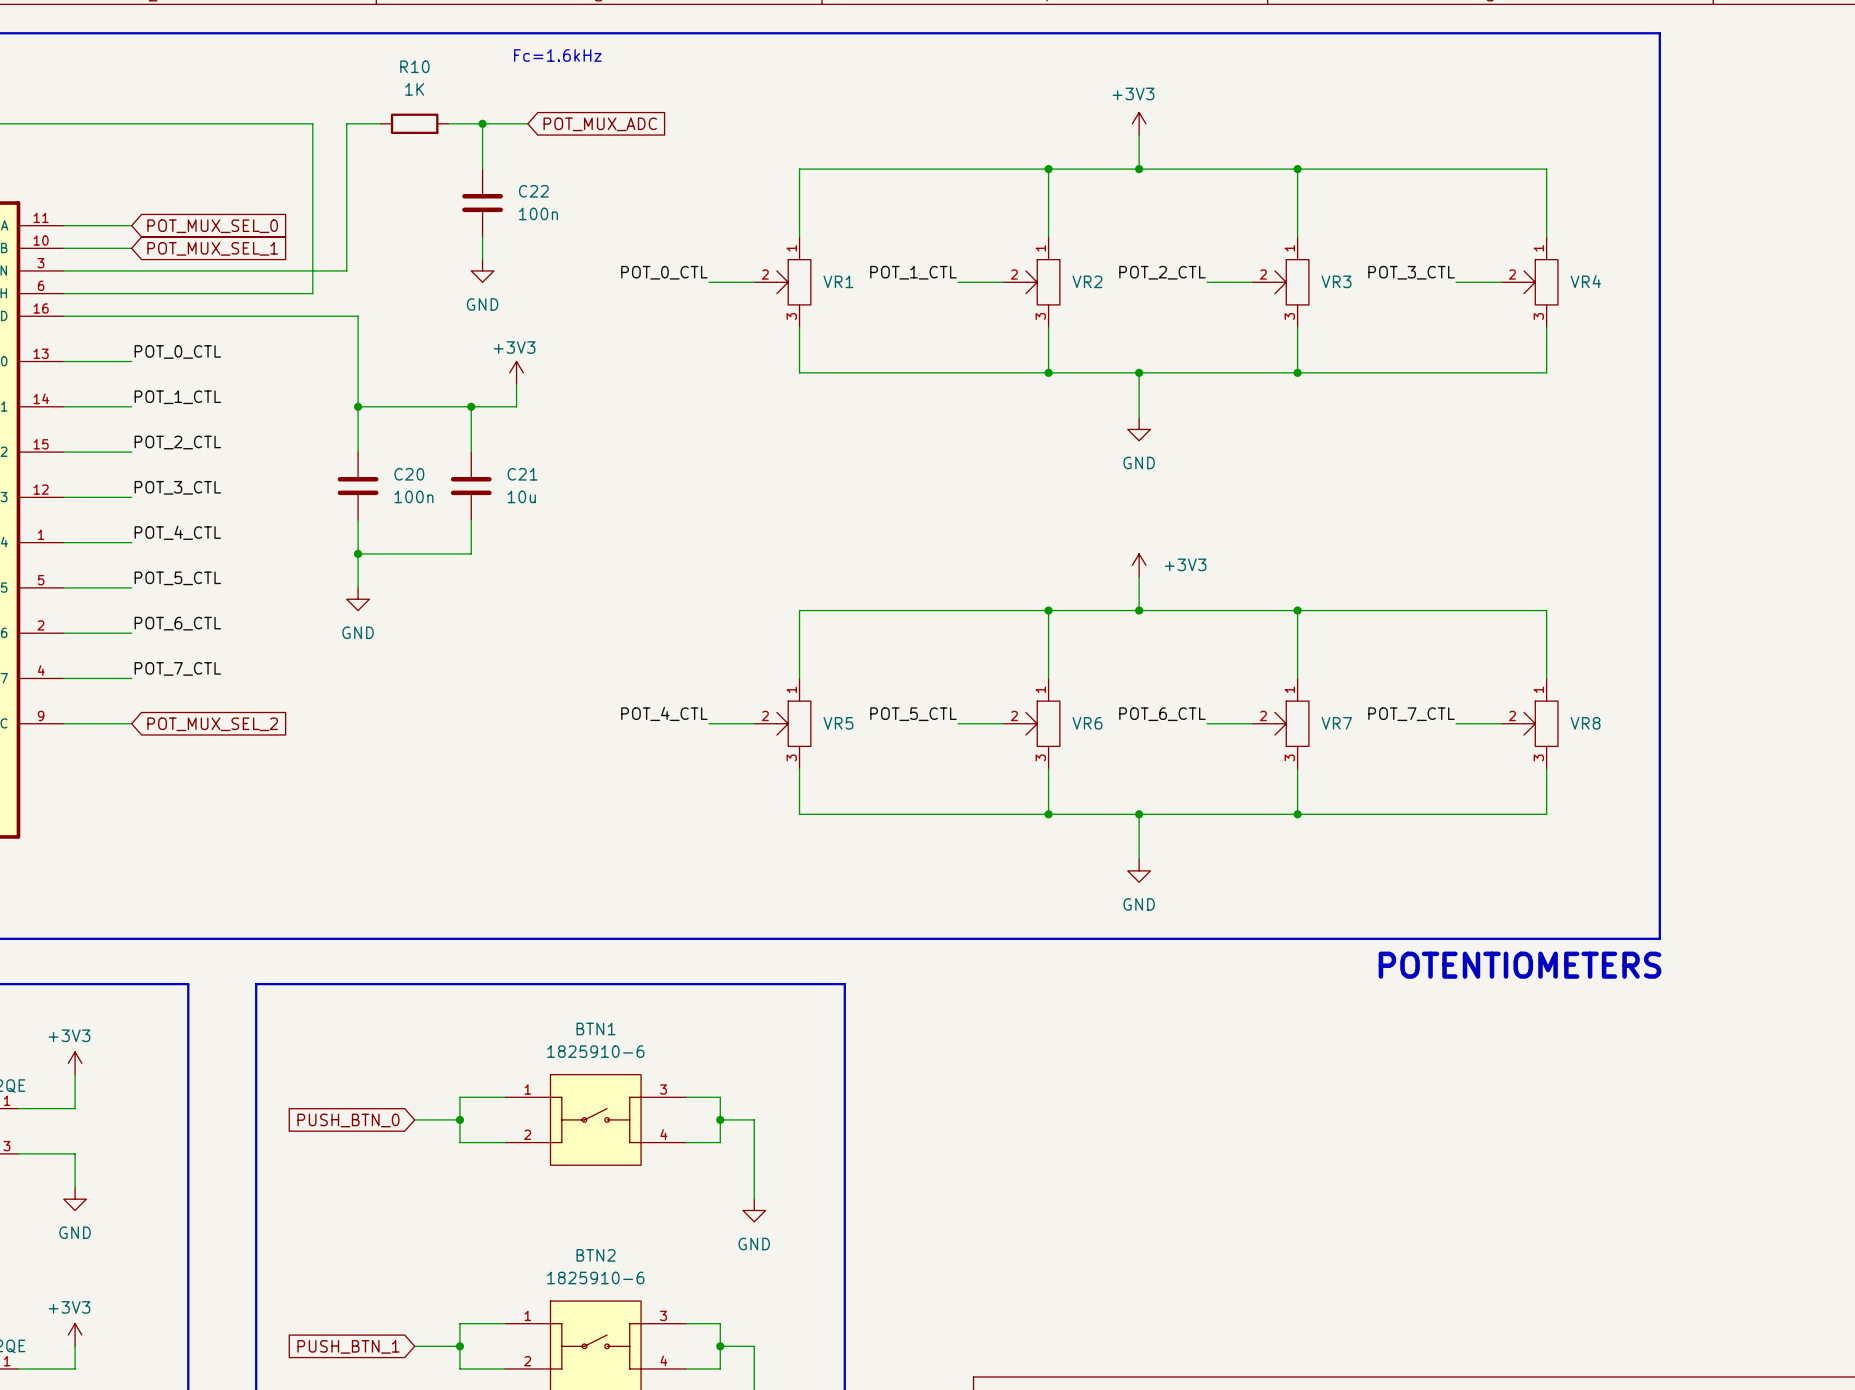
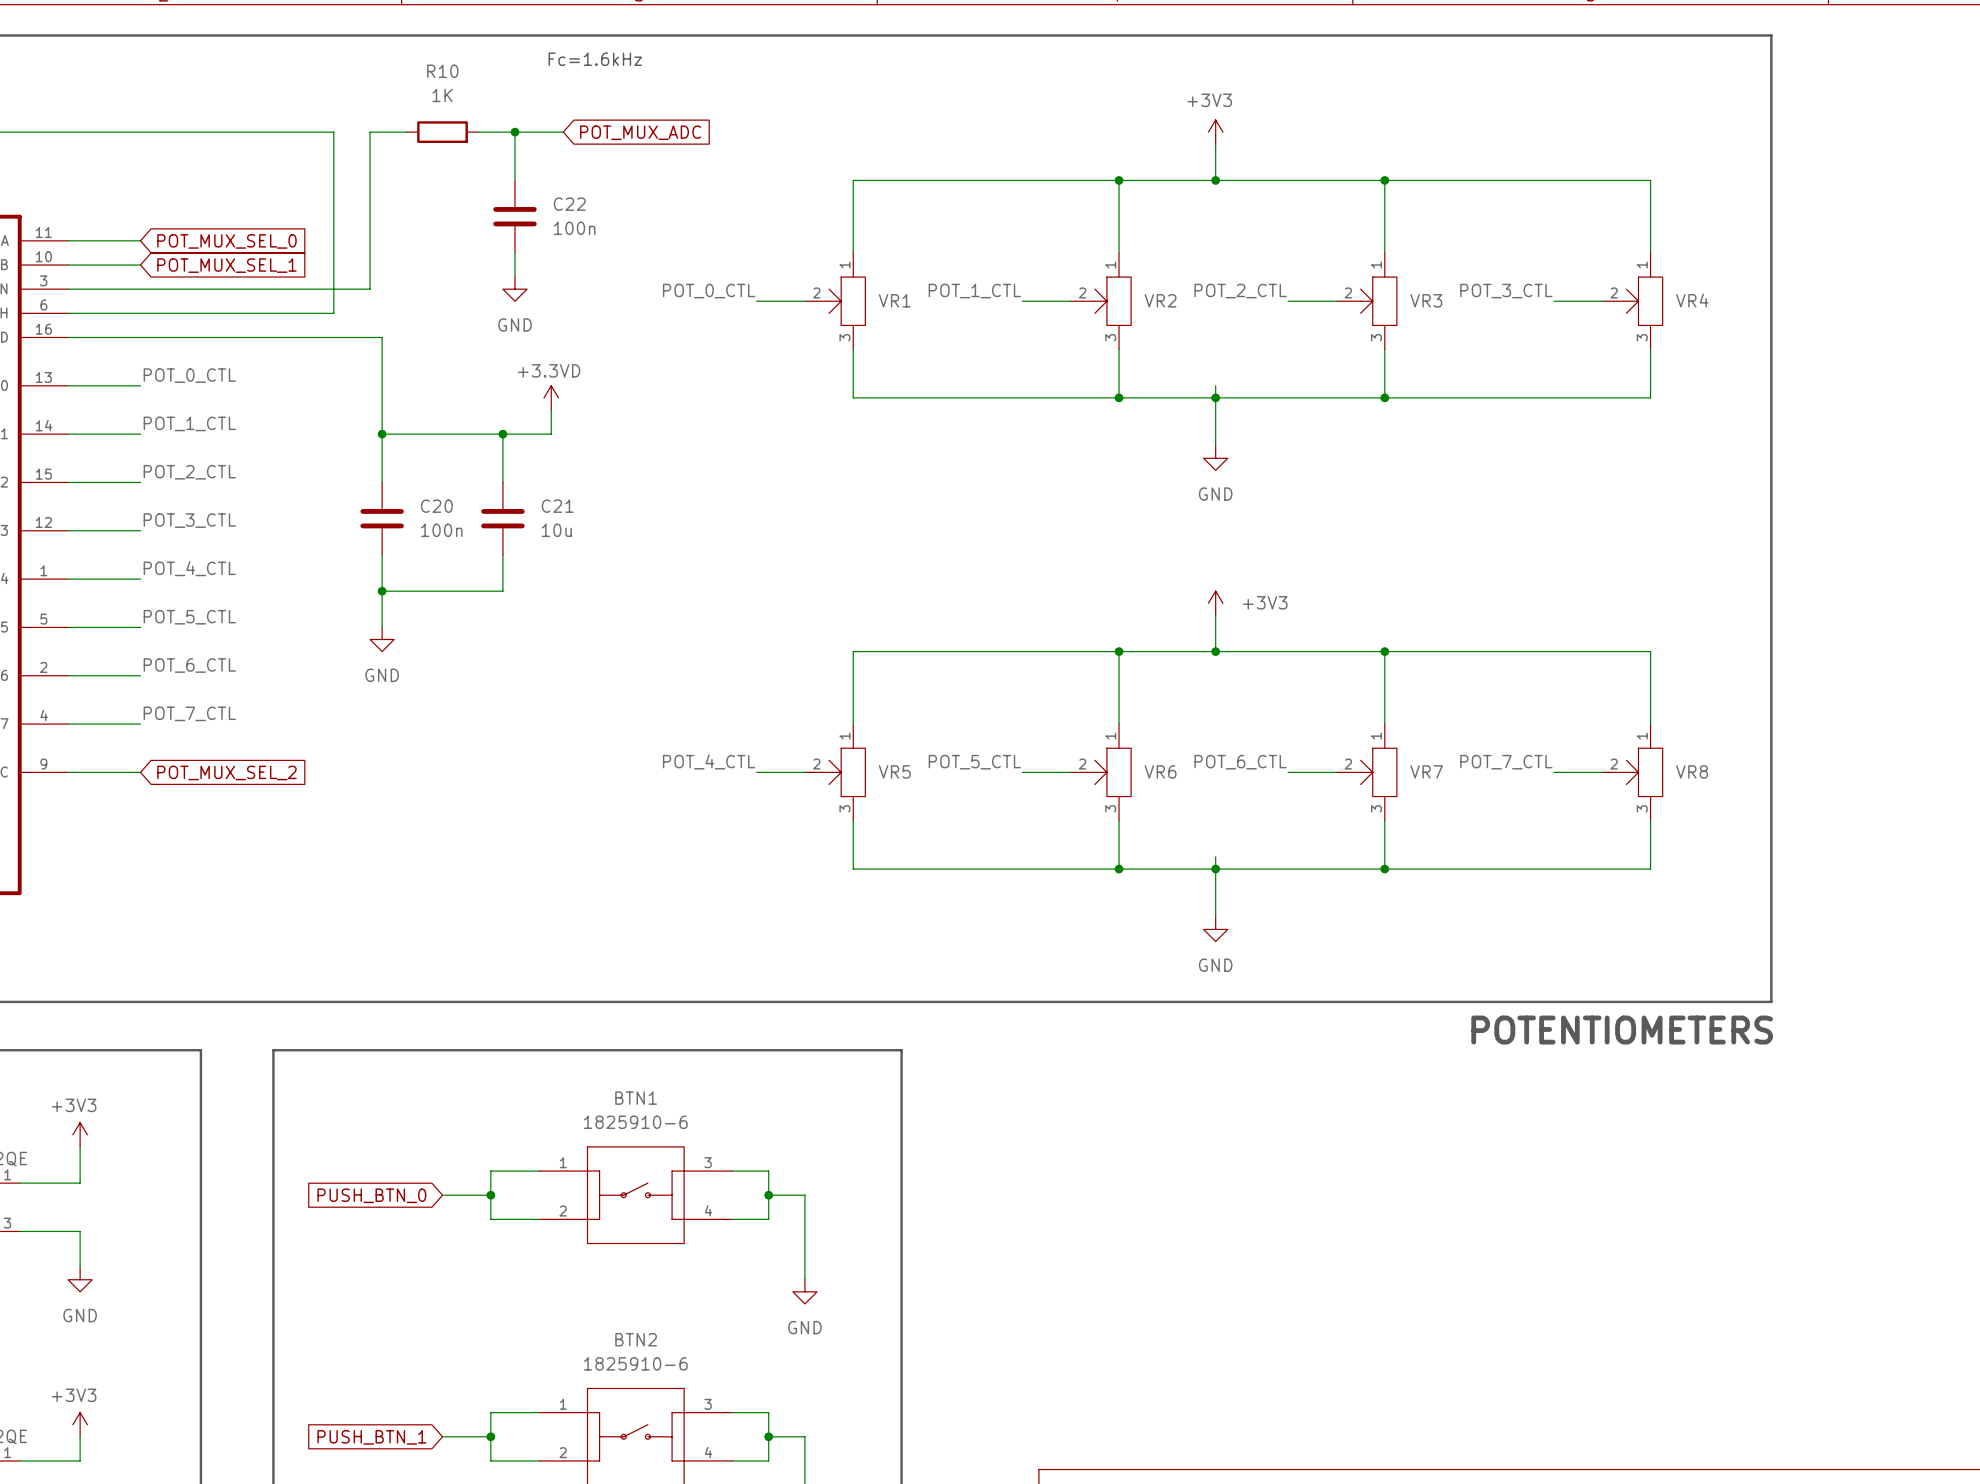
wire: none -> (1215, 385) (1215, 397)
power symbol: +3V3 (516, 372) -> +3.3VD (551, 397)
wire: none -> (1215, 856) (1215, 869)

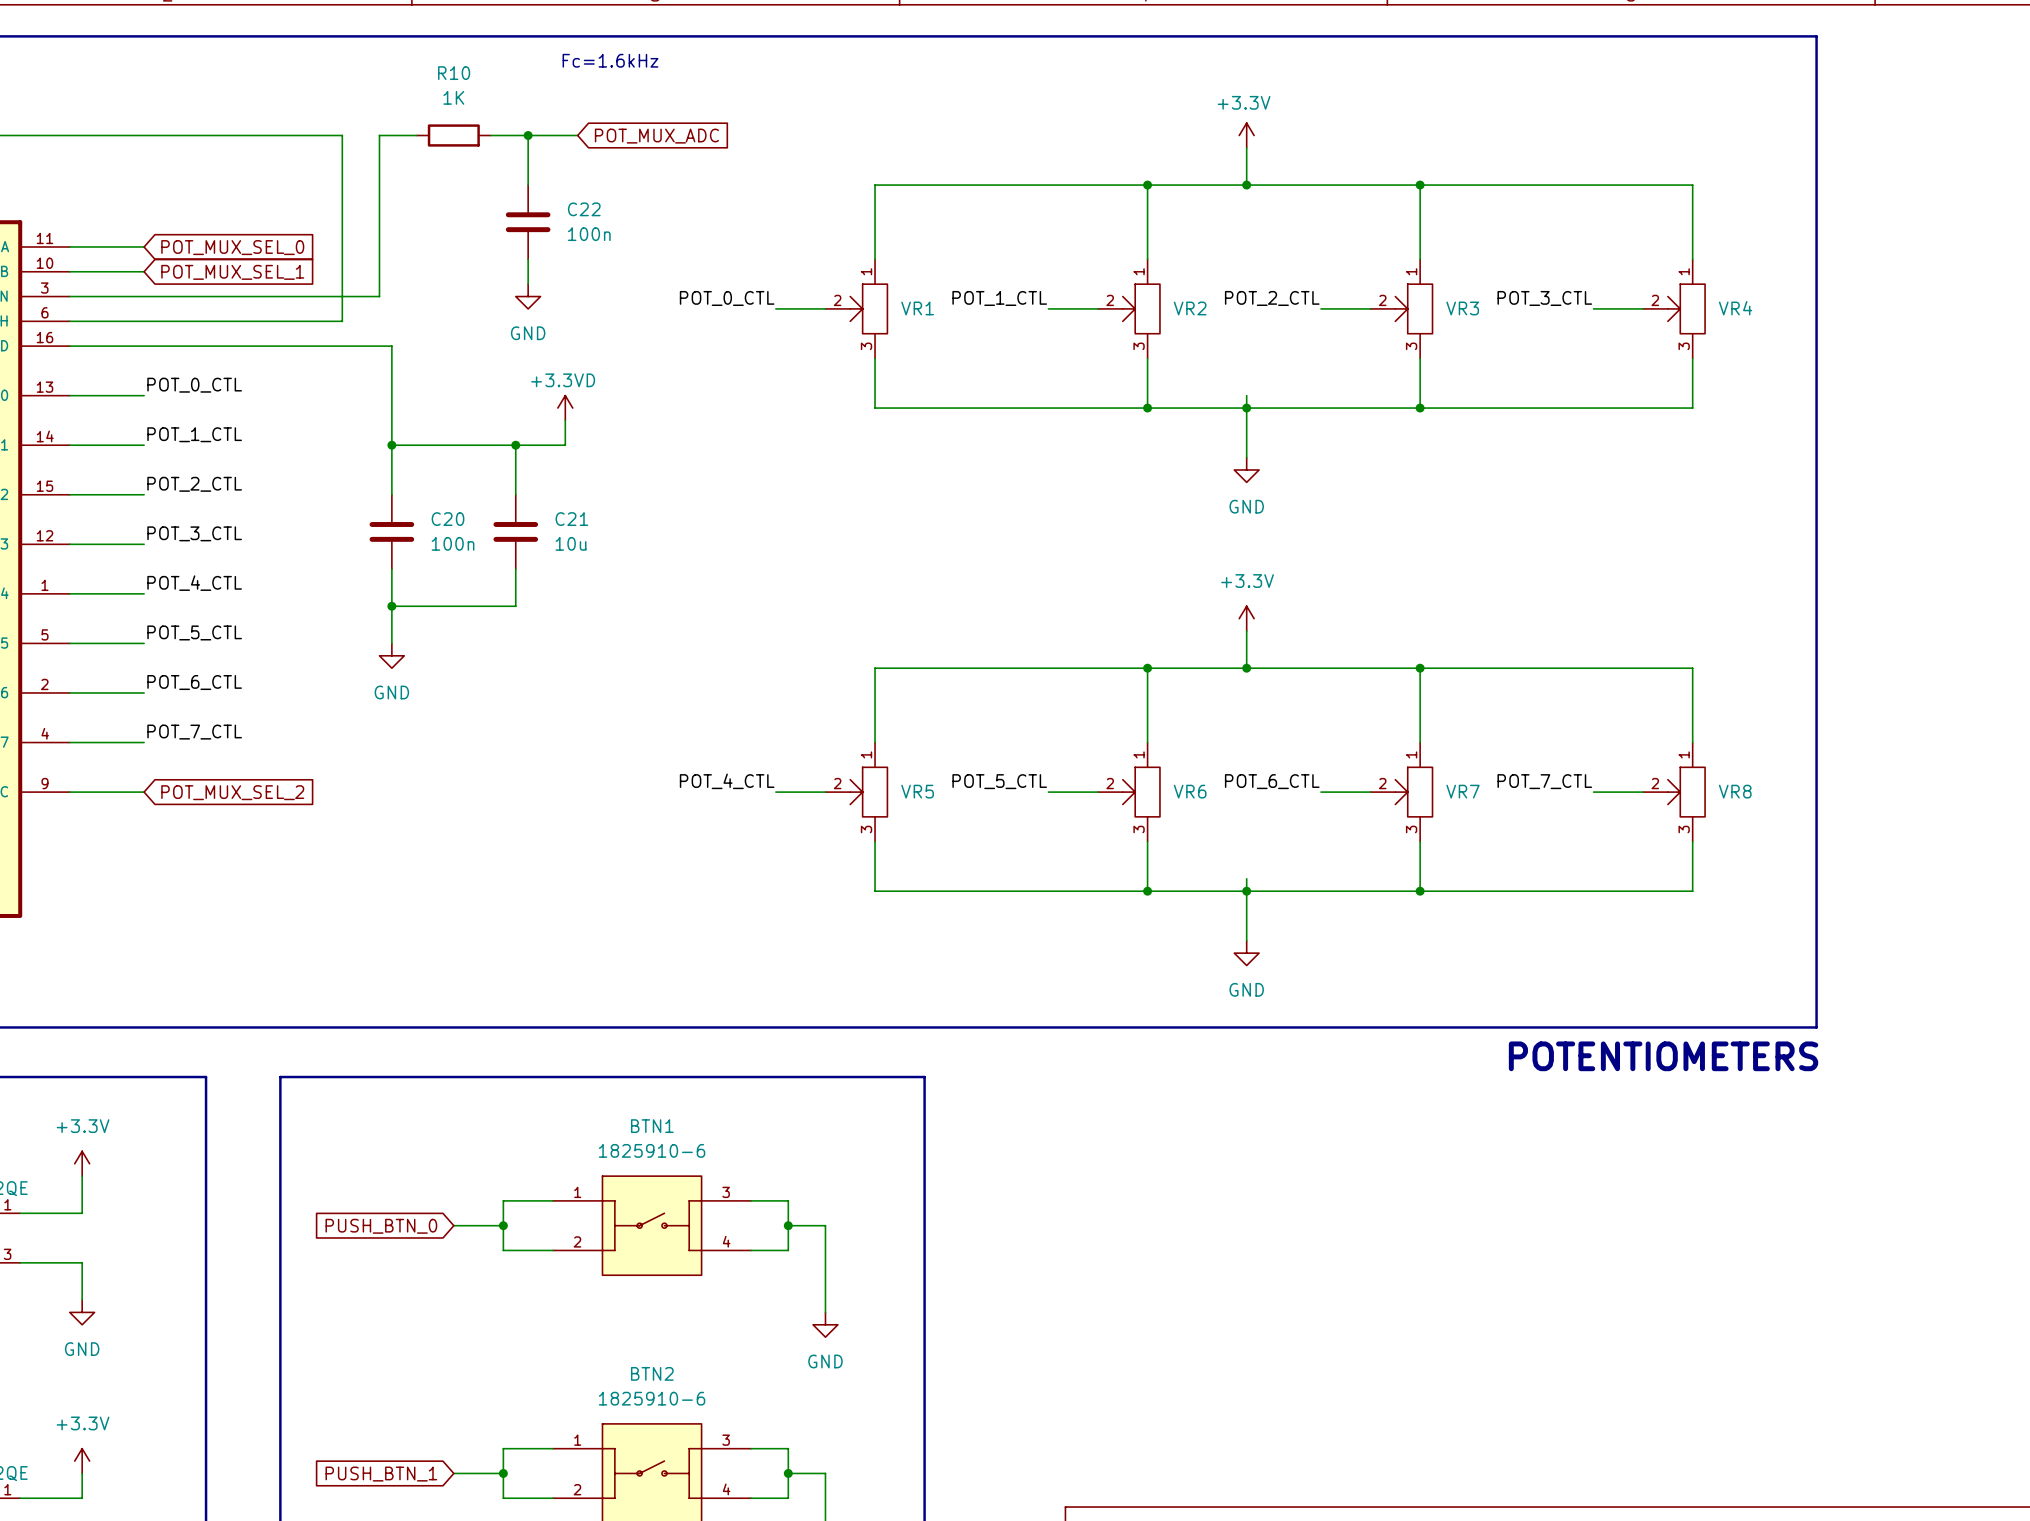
power symbol: +3V3 (1215, 132) -> +3.3V (1246, 135)
power symbol: +3V3 (1215, 603) -> +3.3V (1246, 618)
power symbol: +3V3 (80, 1134) -> +3.3V (82, 1163)
power symbol: +3V3 (80, 1424) -> +3.3V (82, 1461)

